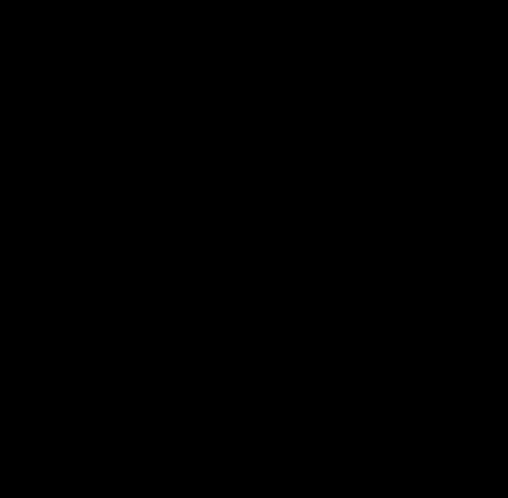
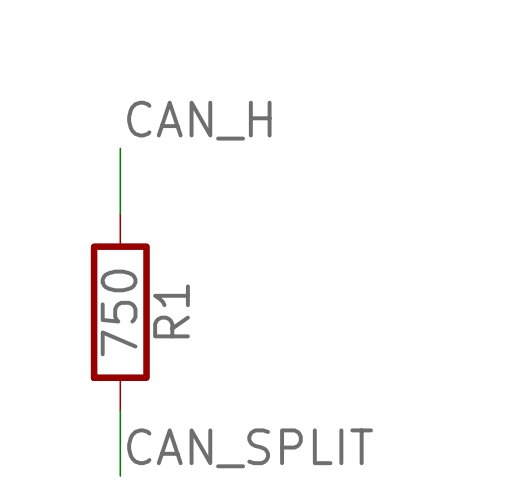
label: none -> CAN_H (199, 120)
wire: none -> (120, 148) (120, 213)
R1: none -> 750 (120, 312)
wire: none -> (120, 410) (120, 476)
label: none -> CAN_SPLIT (250, 448)

